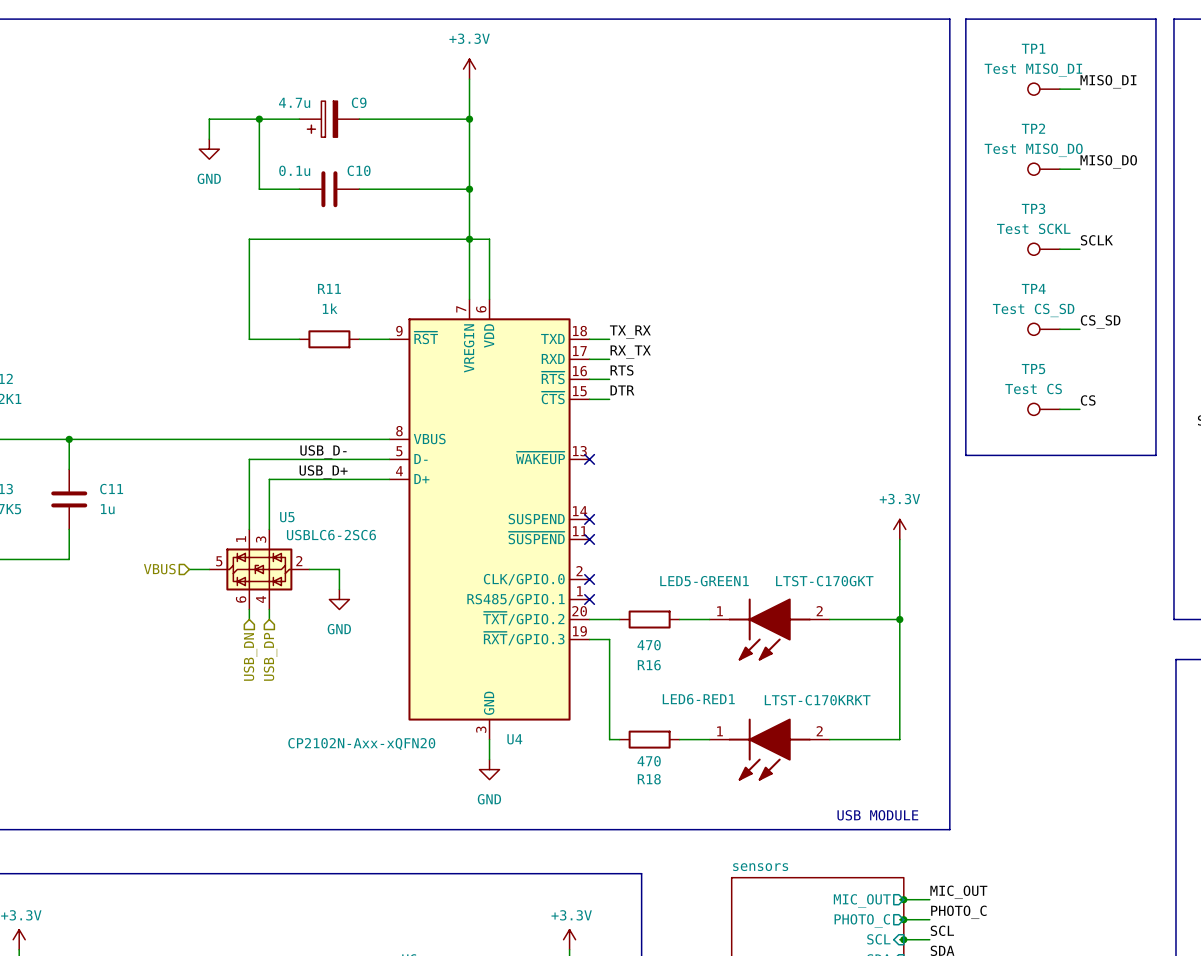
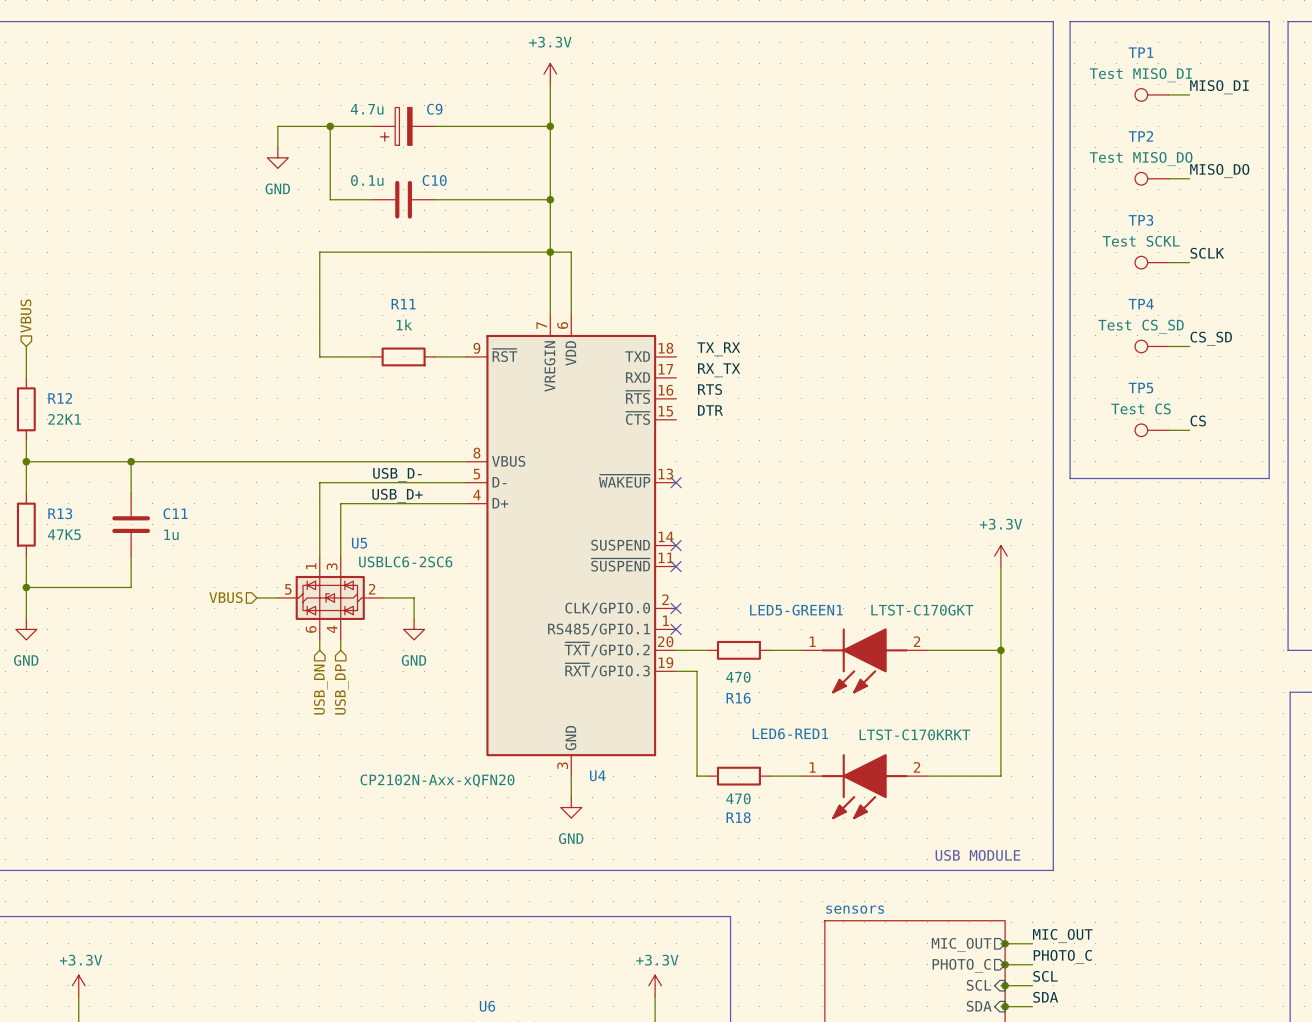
wire: (589, 339) (609, 339) -> none
wire: (589, 359) (609, 359) -> none
wire: (589, 379) (609, 379) -> none
wire: (589, 399) (609, 399) -> none

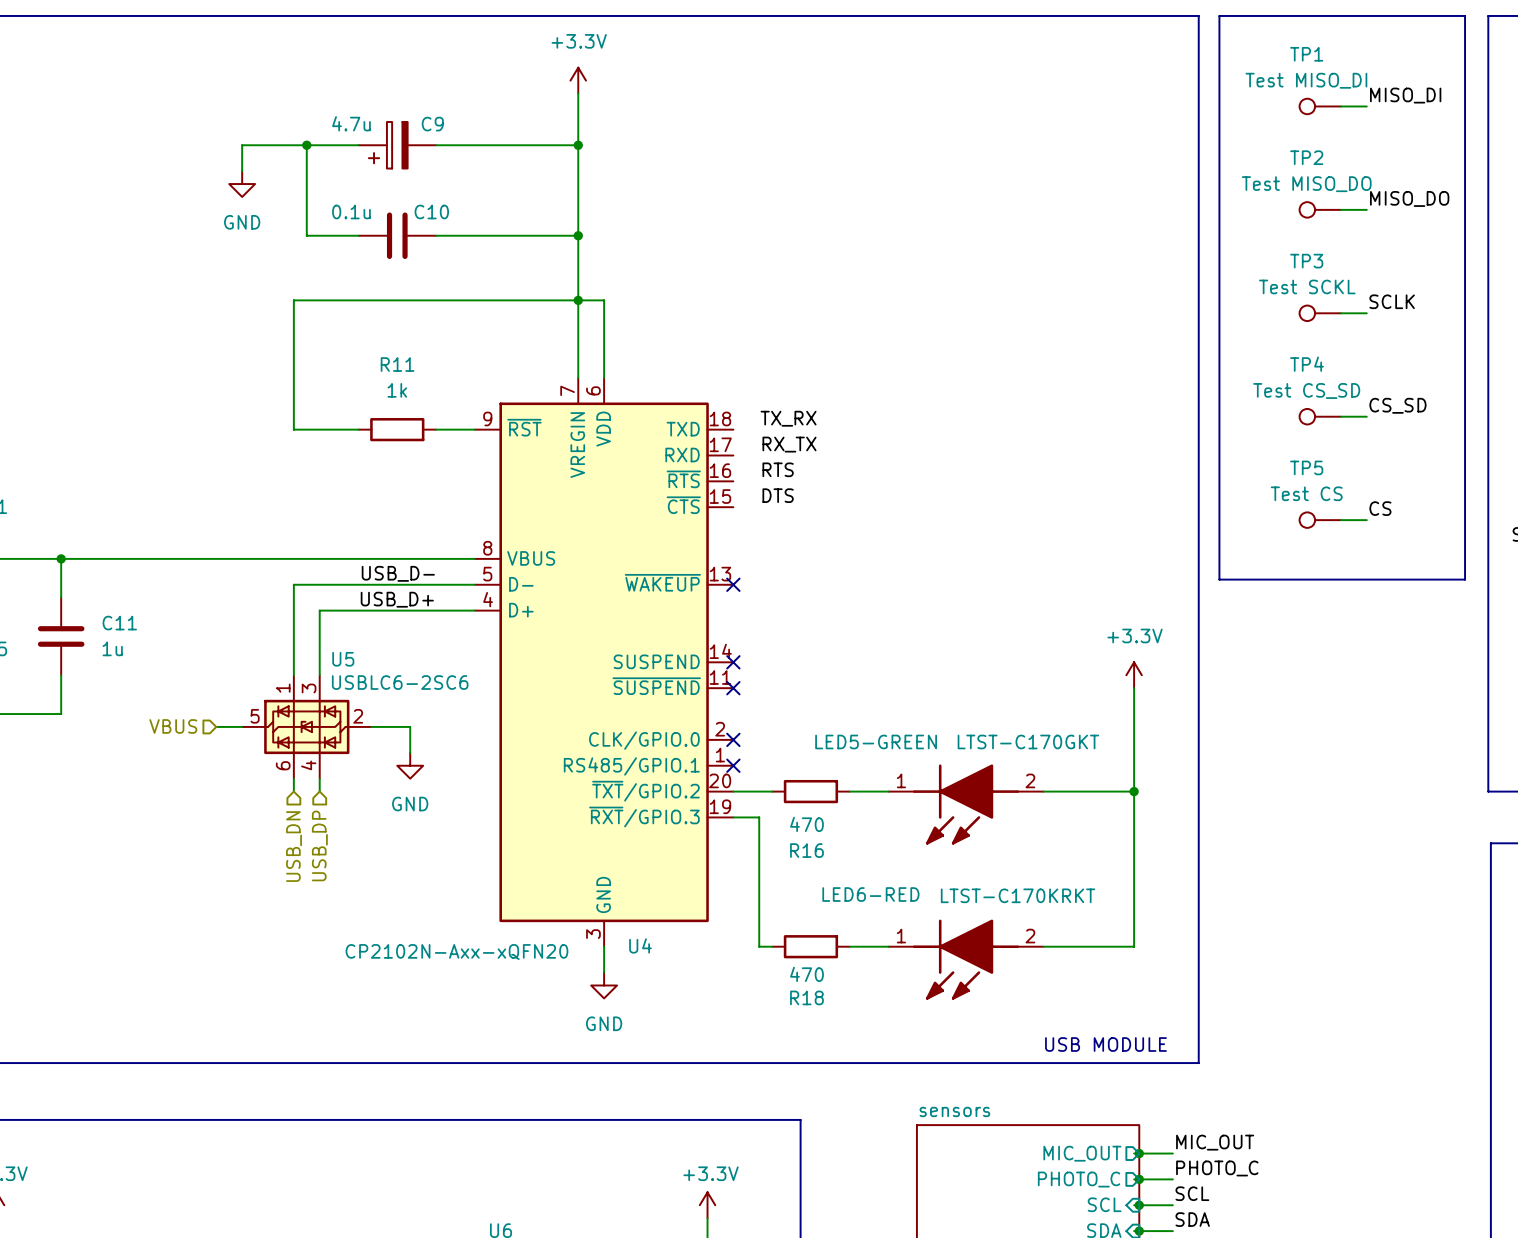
label: DTR (710, 410) -> DTS (778, 495)
LED5-GREEN1 name: LED5-GREEN1 (796, 610) -> LED5-GREEN (876, 741)
LED6-RED1 name: LED6-RED1 (790, 733) -> LED6-RED (870, 894)

